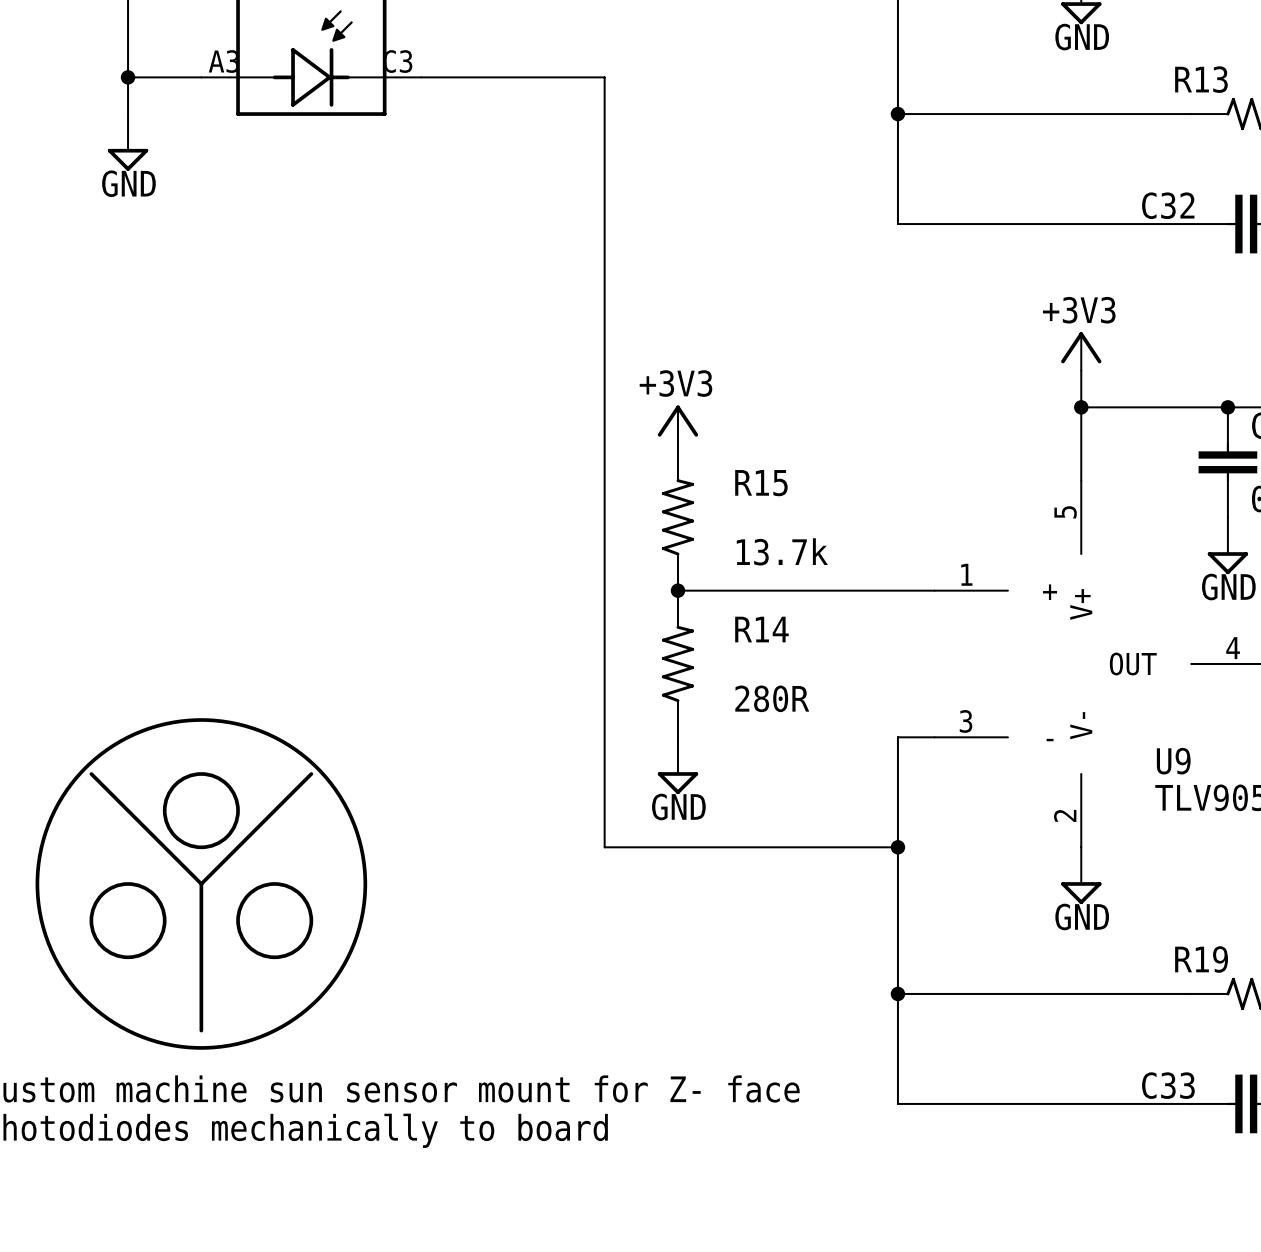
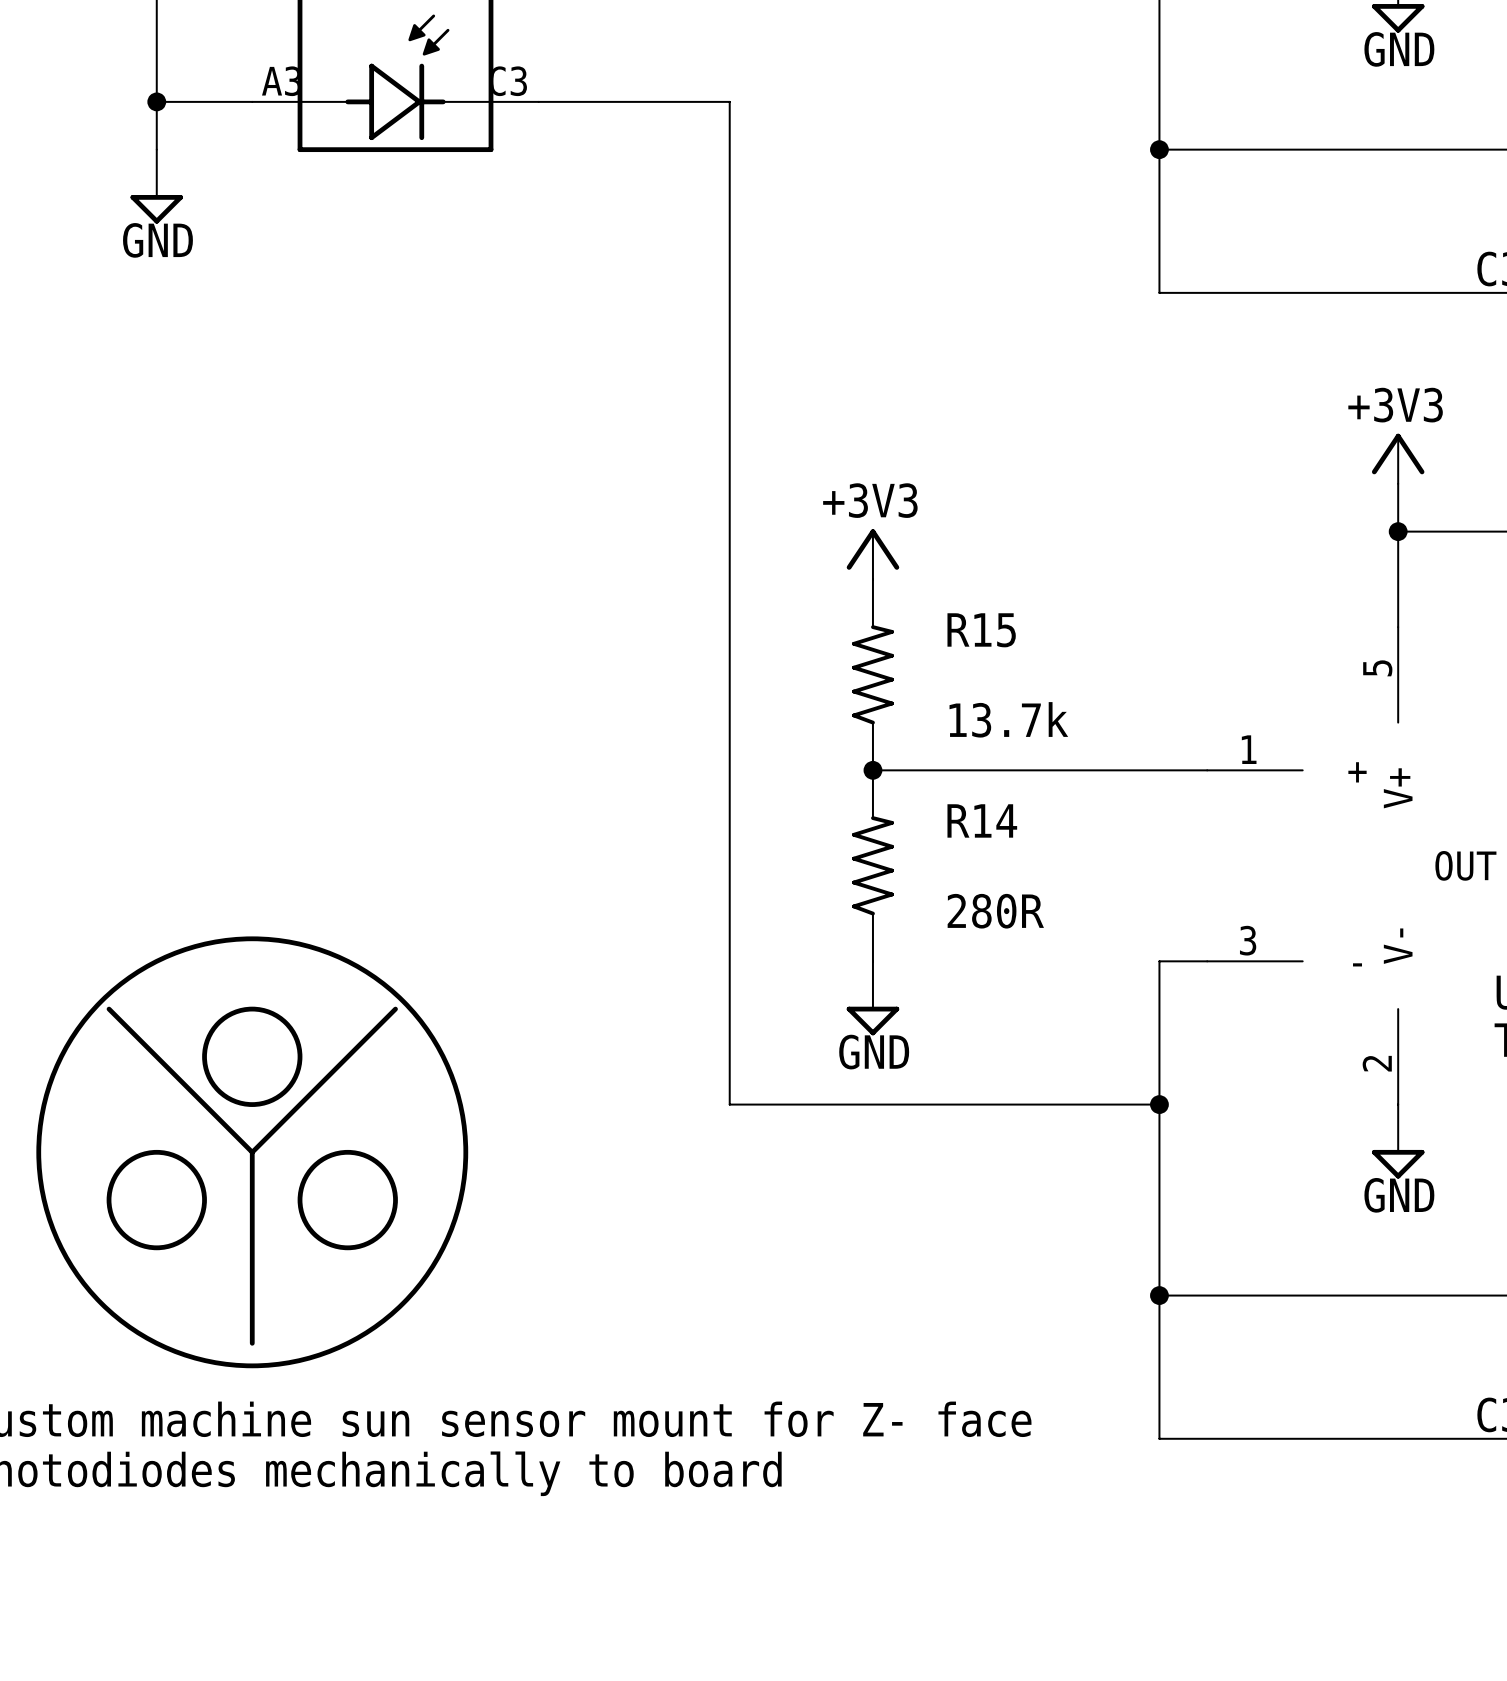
wire: (567, 77) (604, 77) (604, 847) -> (729, 101) (729, 1104) (777, 1104)

